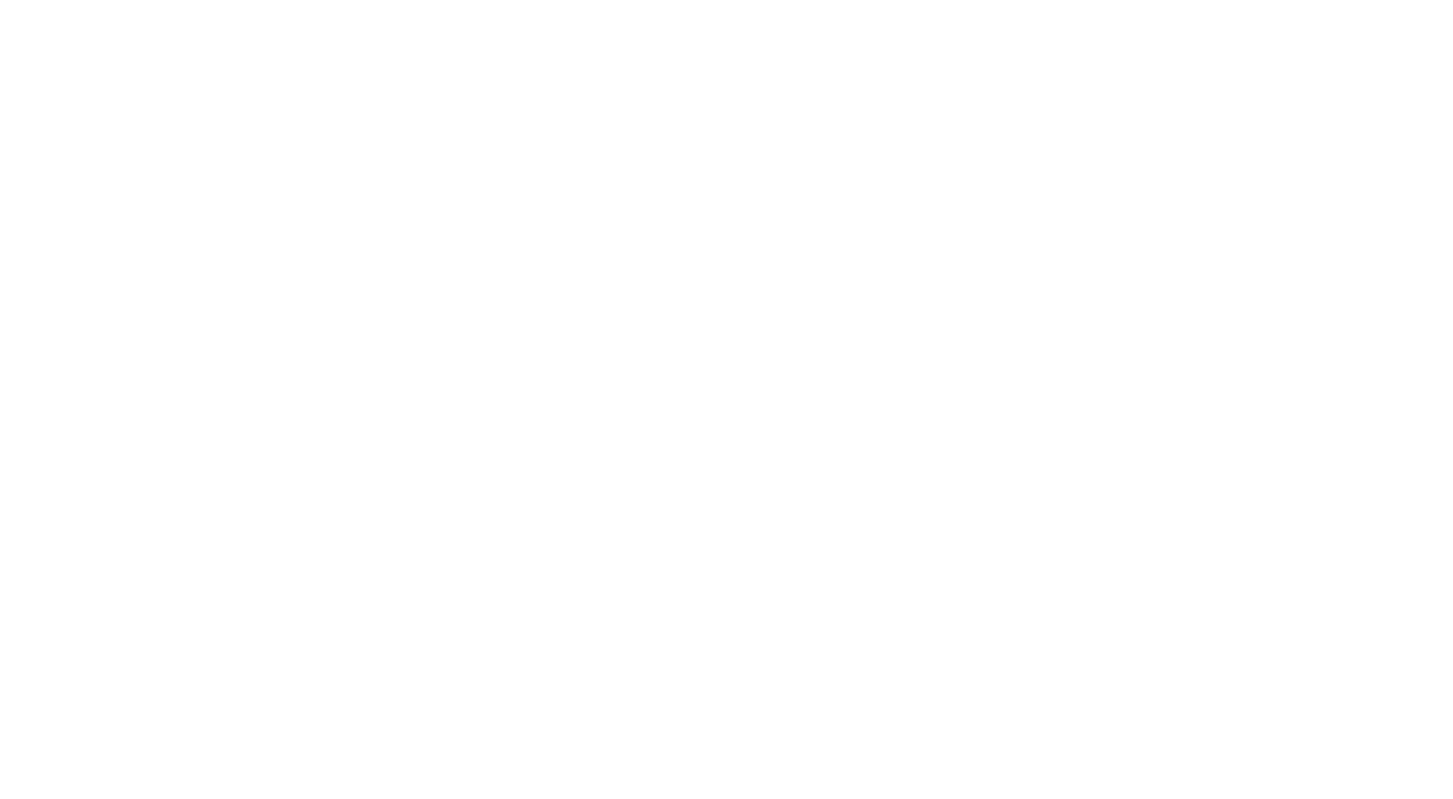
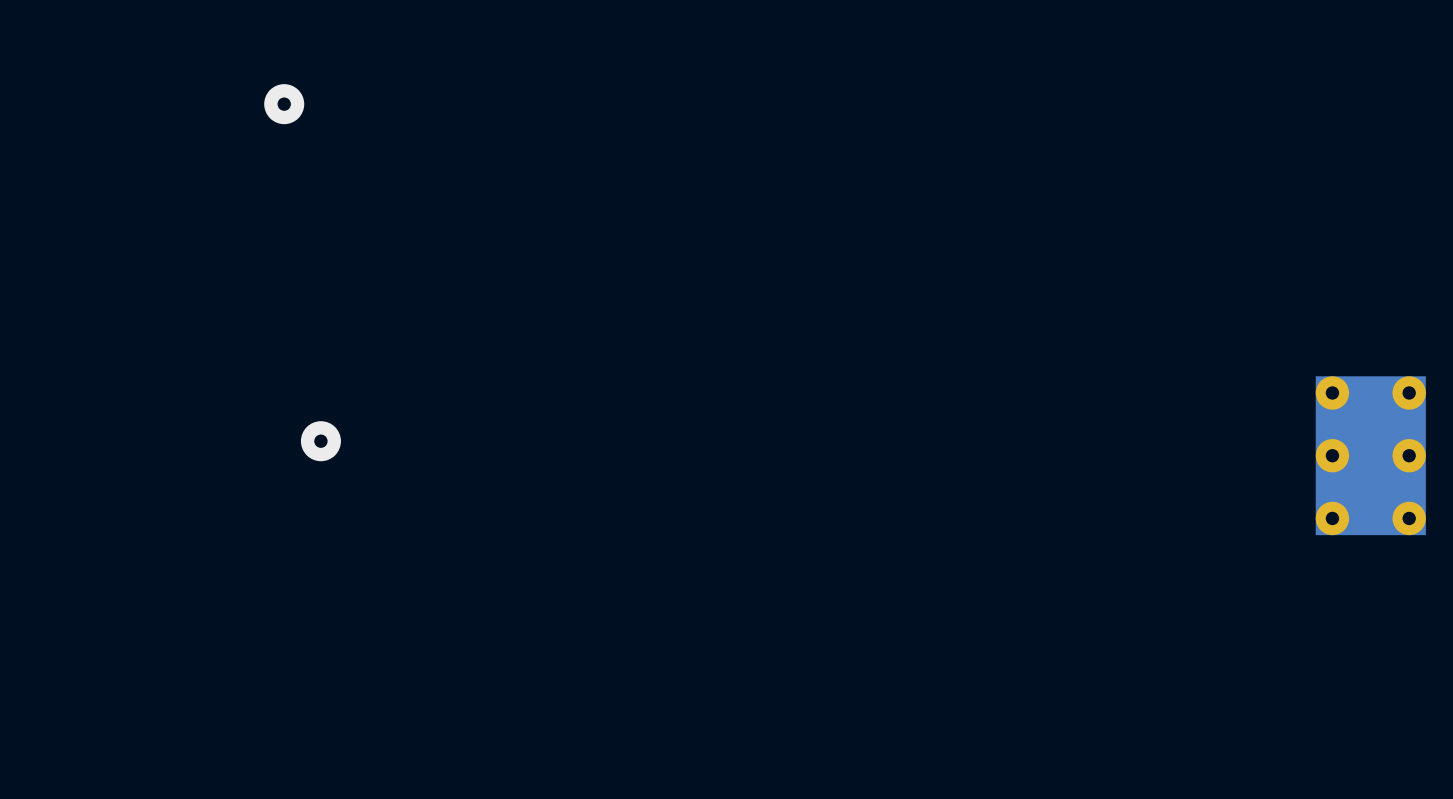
via: none -> (284, 104)
via: none -> (320, 441)
part: none -> (1370, 455)

